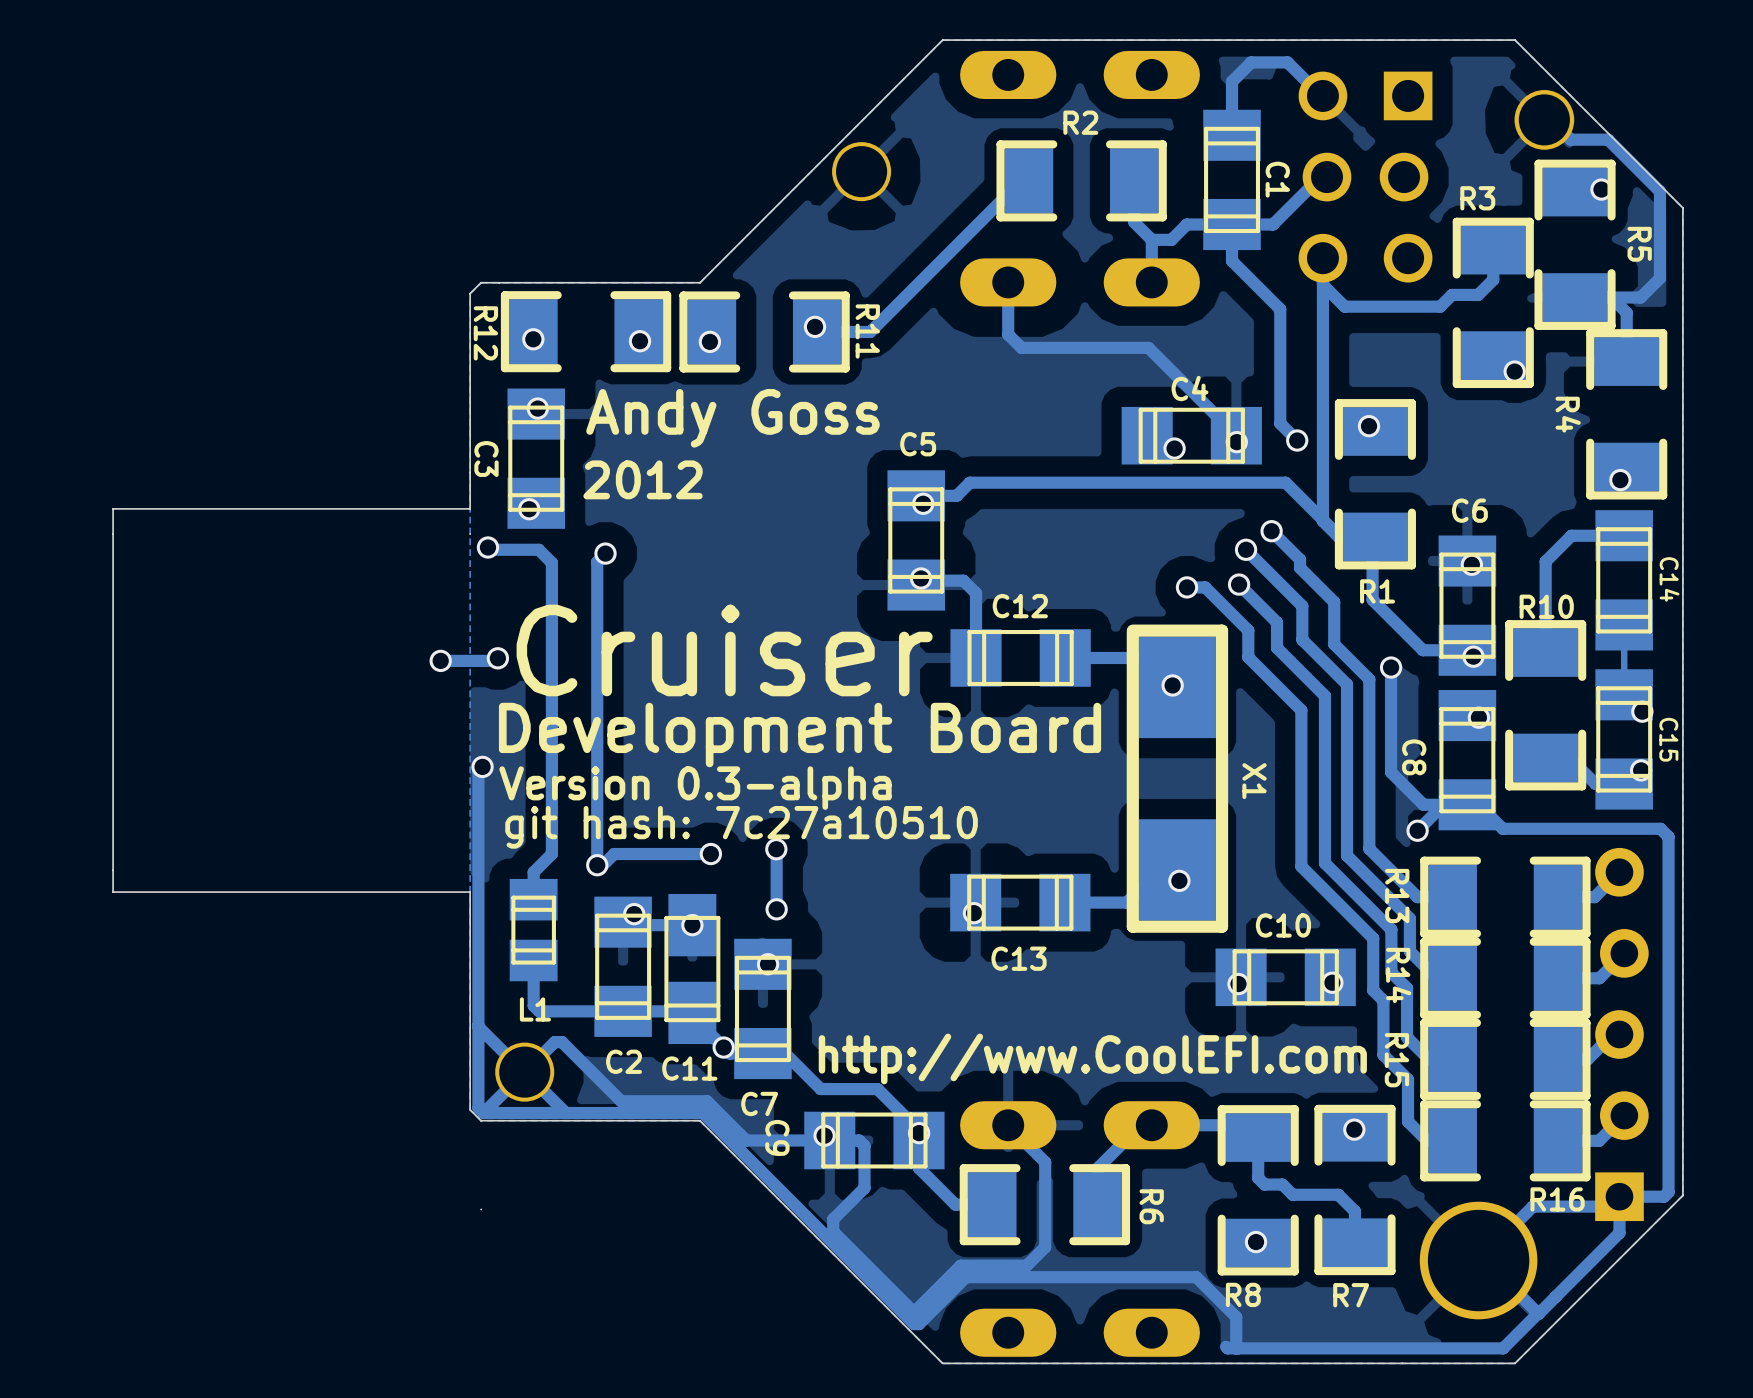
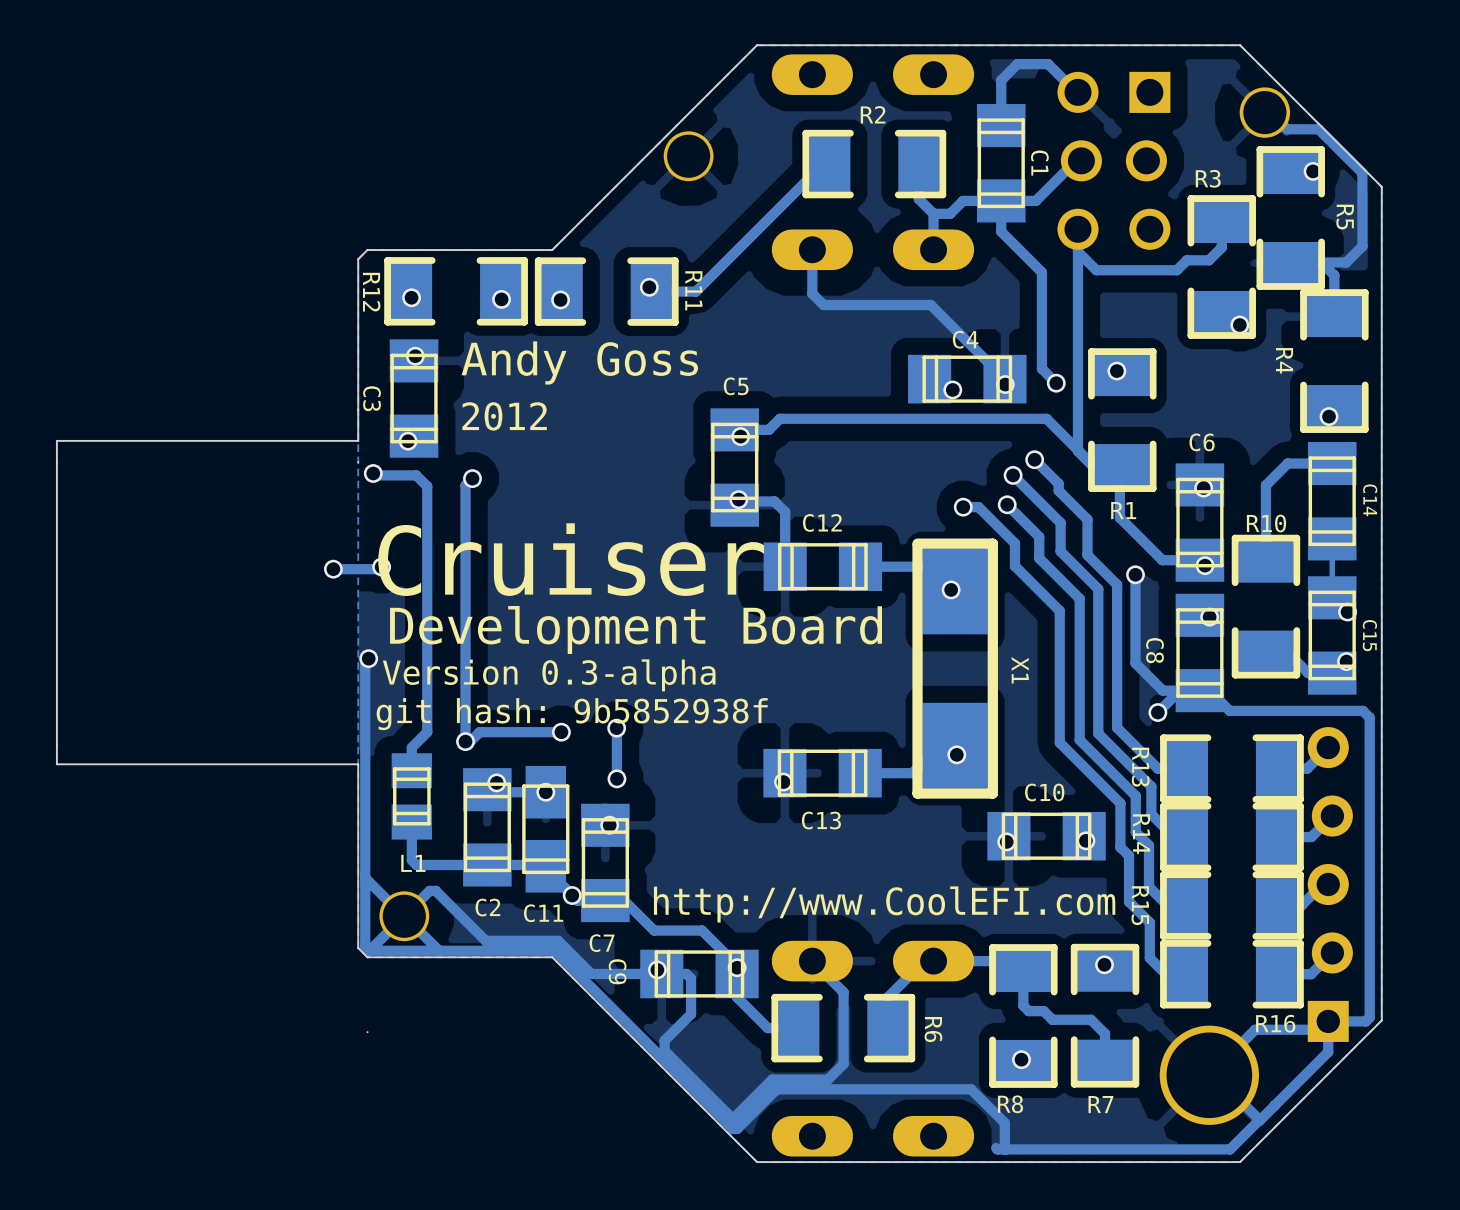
text: git hash: 7c27a10510 (741, 827) -> git hash: 9b5852938f (572, 714)

